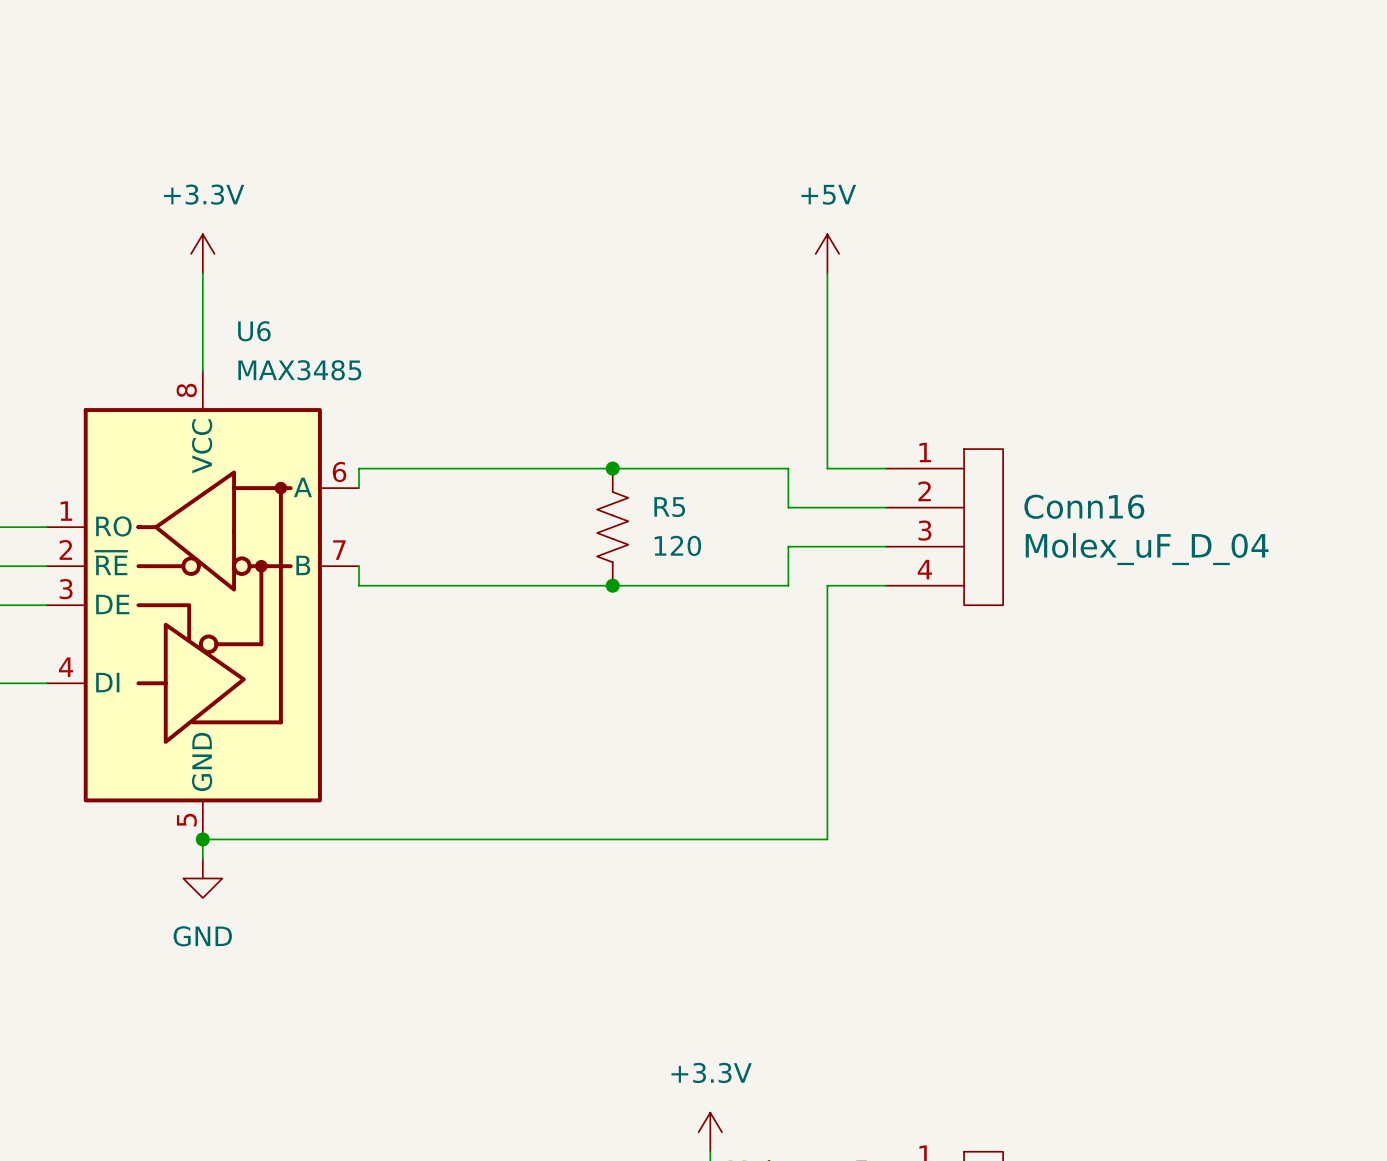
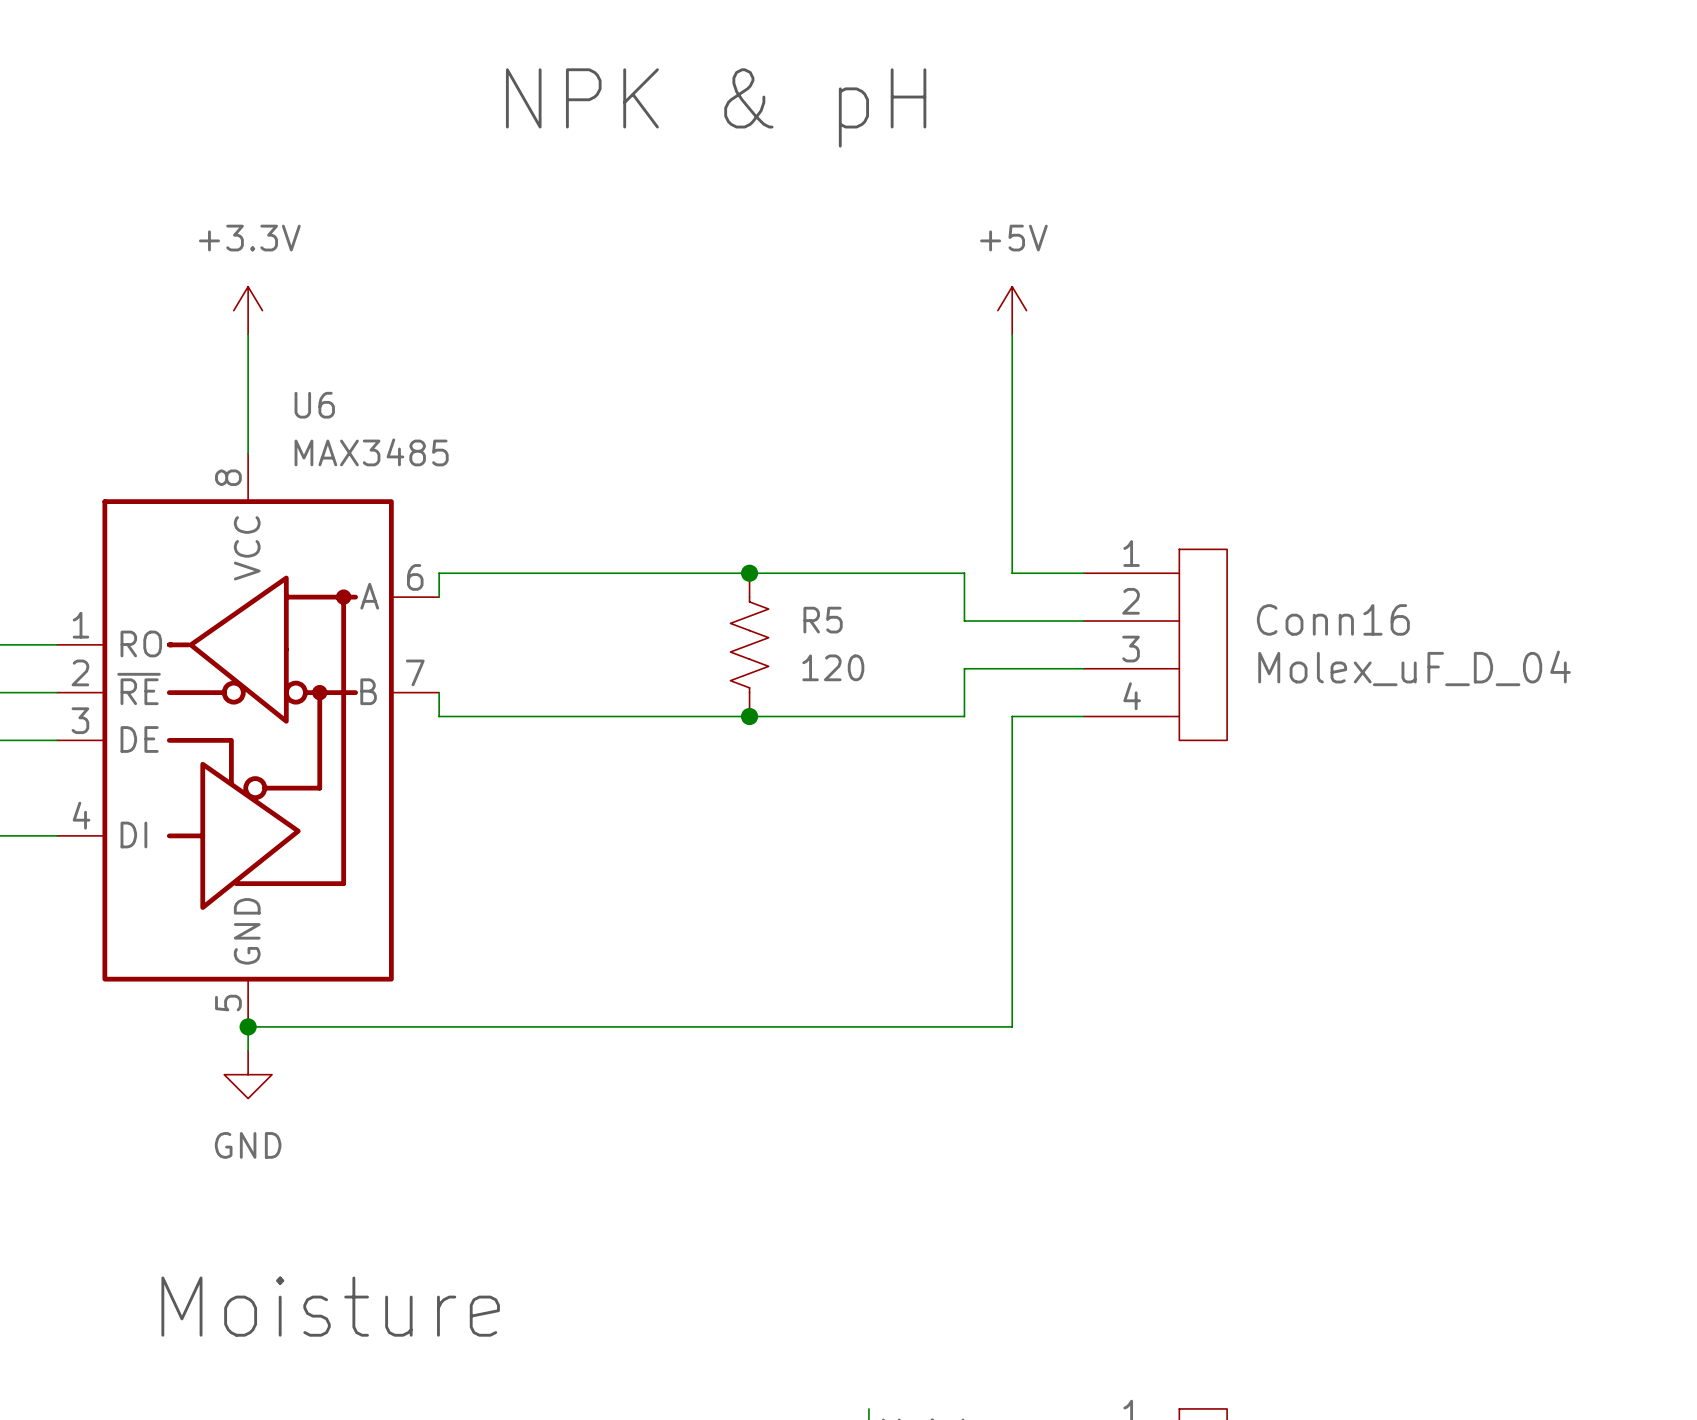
text: none -> NPK & pH (716, 107)
text: none -> Moisture (330, 1306)
power symbol: +3.3V (710, 1132) -> none

